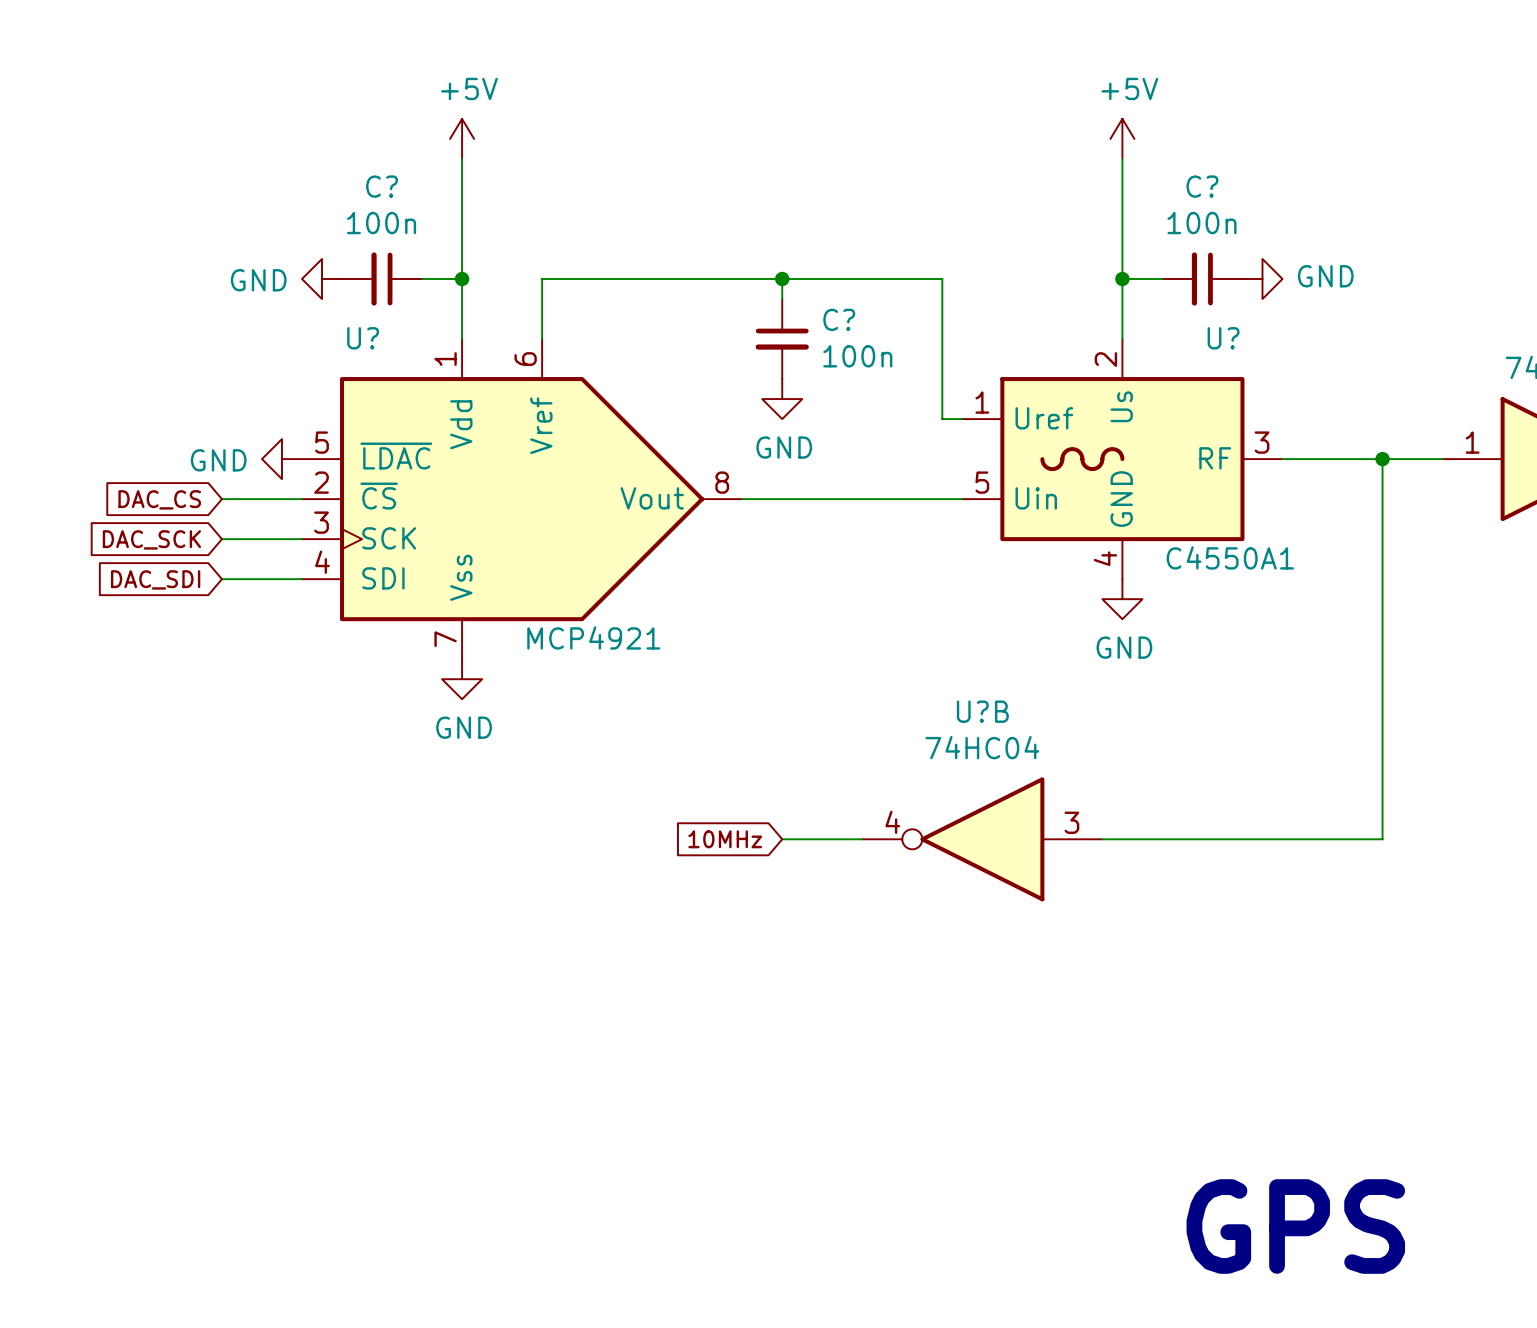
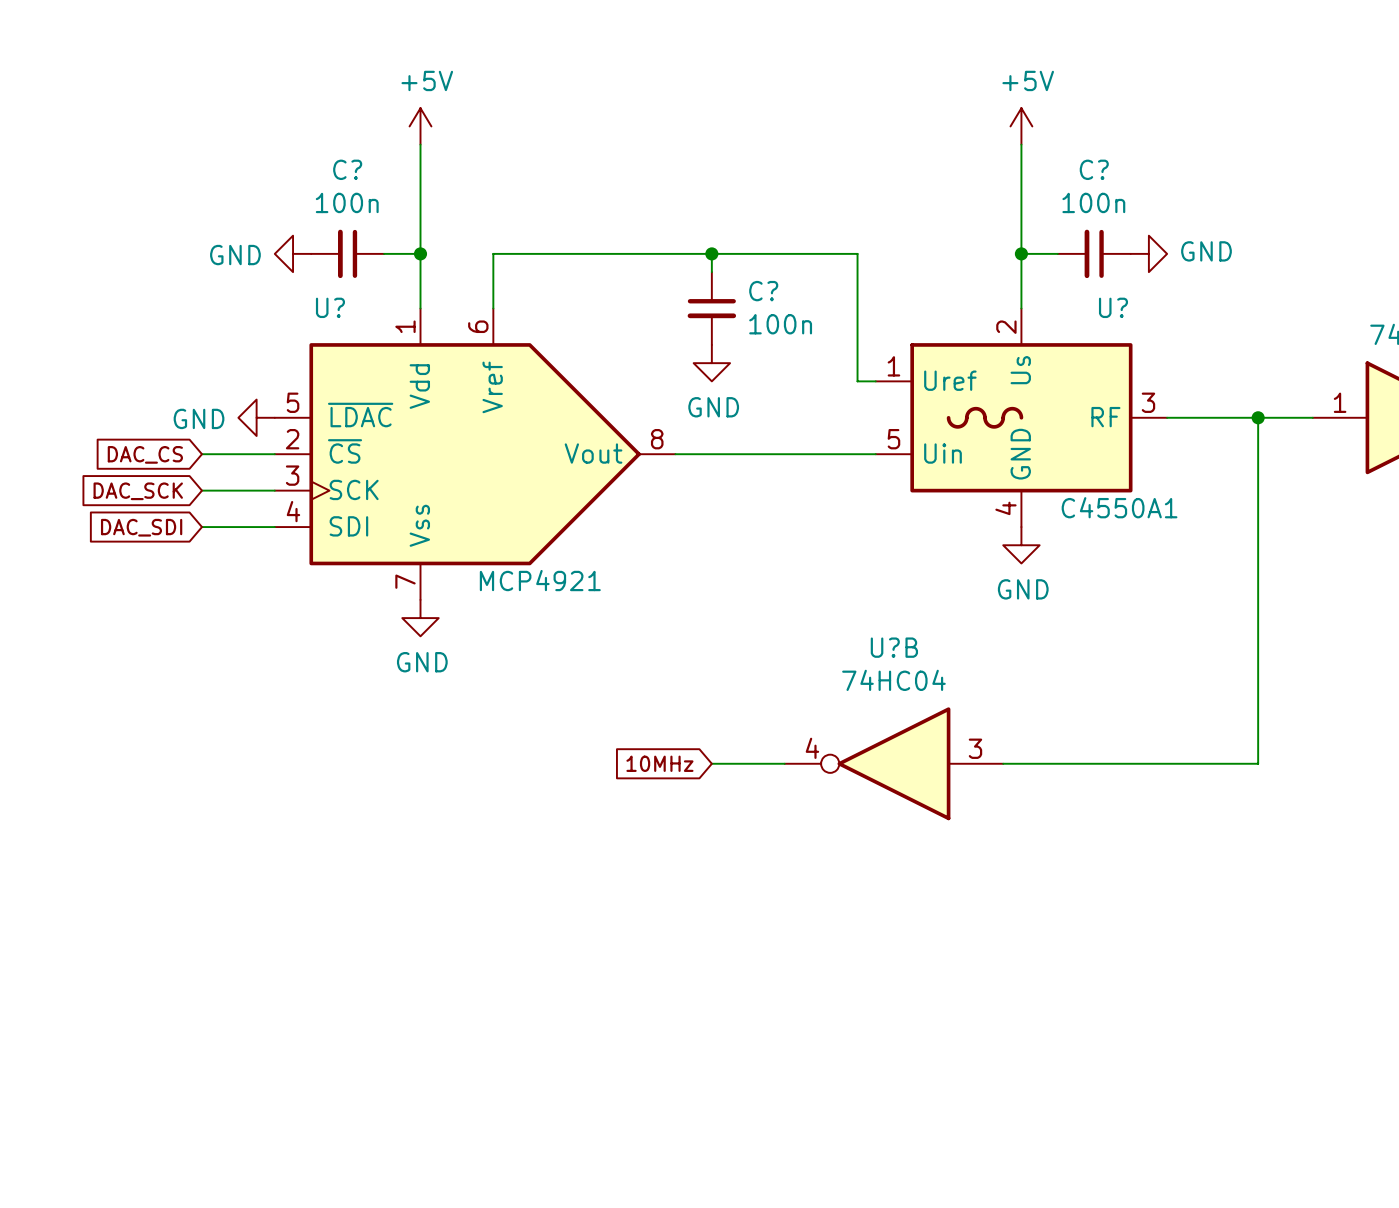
text: GPS (1295, 1226) -> none

